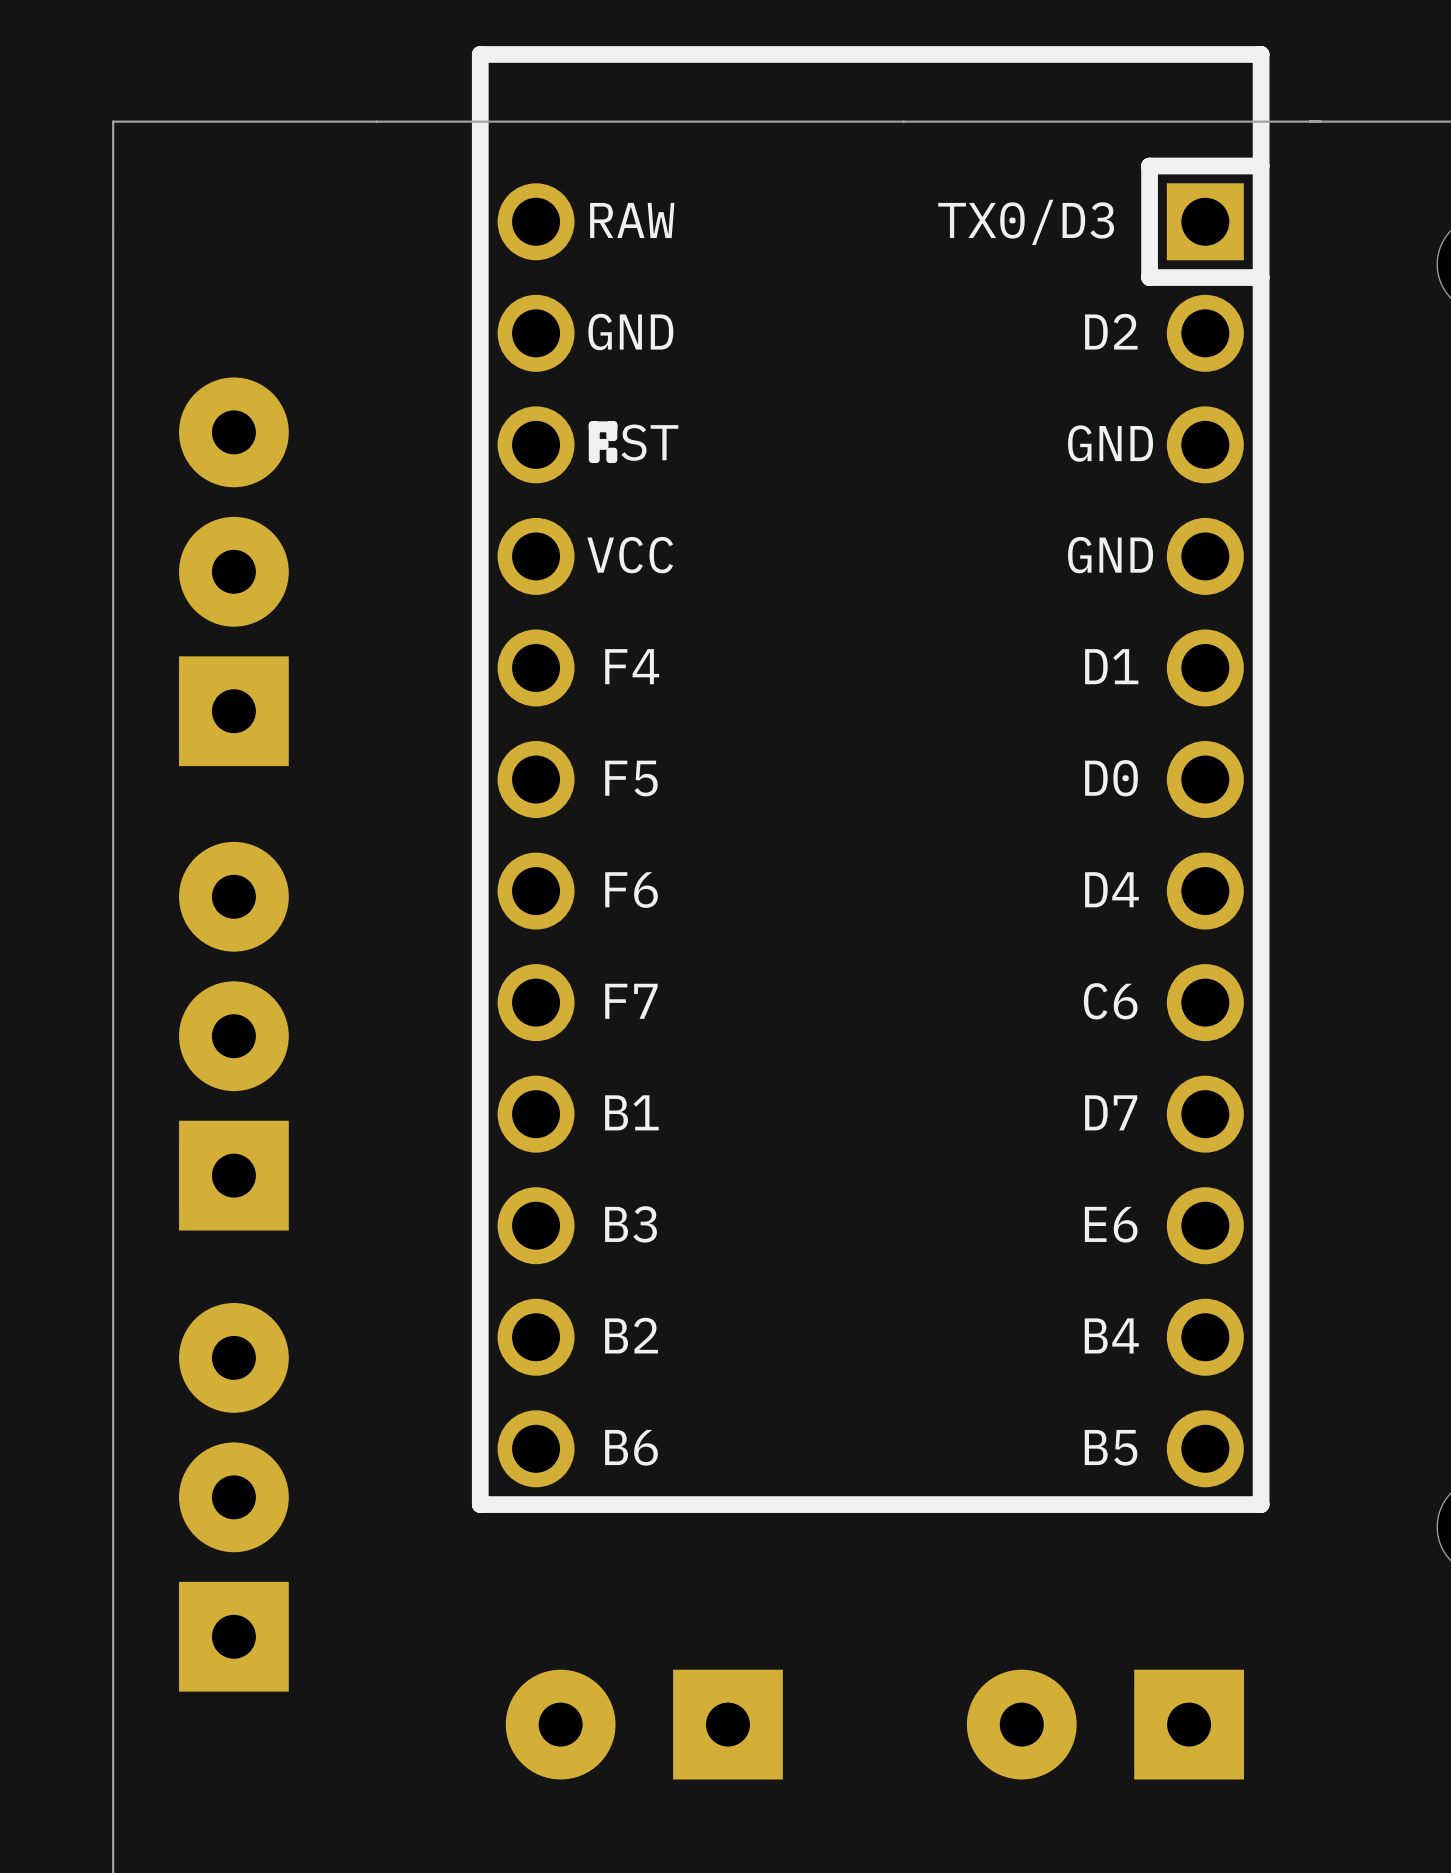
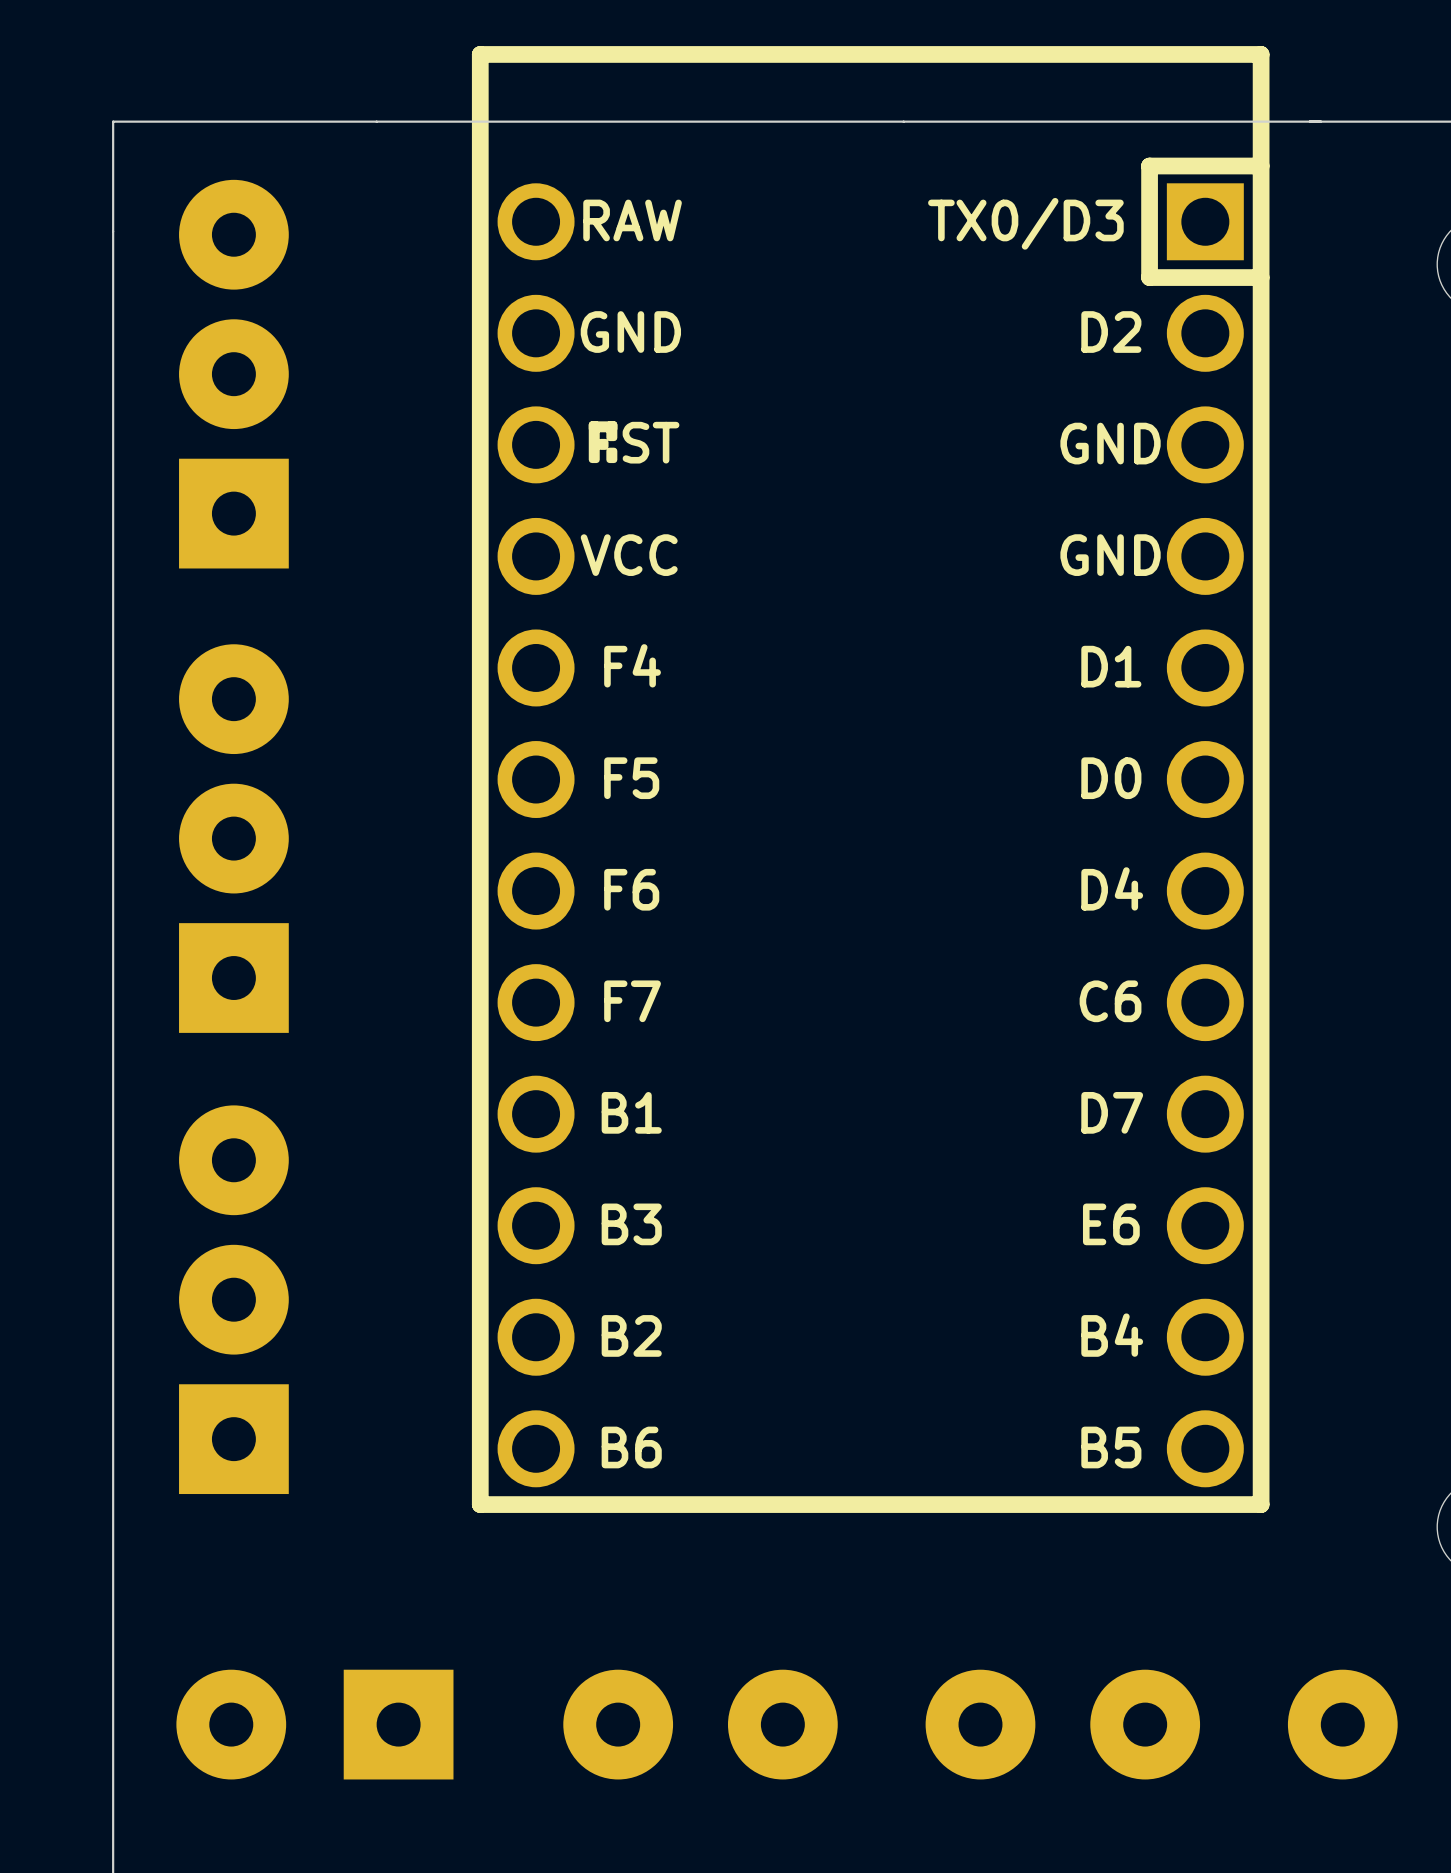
part: none -> (233, 374)
part: (233, 571) -> none
part: none -> (233, 838)
part: (233, 1036) -> none
part: none -> (233, 1299)
part: (233, 1497) -> none
part footprint: [505, 1669, 783, 1780] -> [563, 1669, 674, 1780]
part footprint: [966, 1669, 1244, 1780] -> [1090, 1669, 1201, 1780]
part: none -> (314, 1724)
part: none -> (782, 1724)
part: none -> (980, 1724)
part: none -> (1342, 1724)

